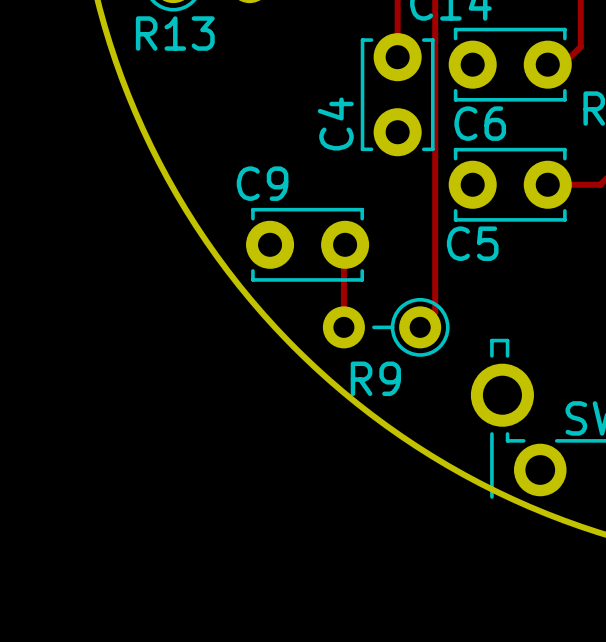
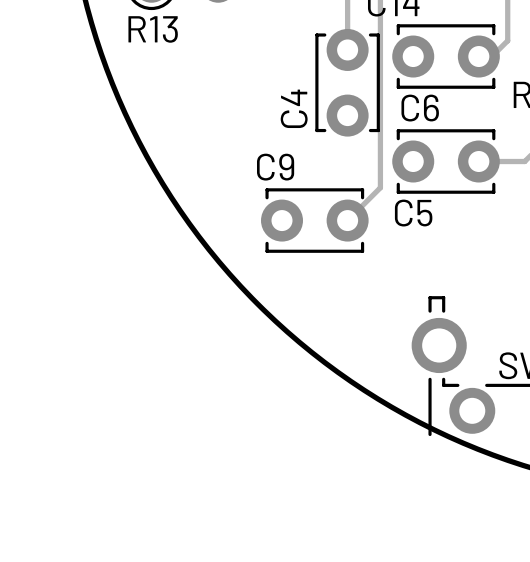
track: (435, 214) (435, 312) (420, 327) -> (380, 187) (347, 220)
C9 position: (307, 244) -> (314, 220)
track: (345, 244) (343, 327) -> none
R9: (386, 327) -> none

